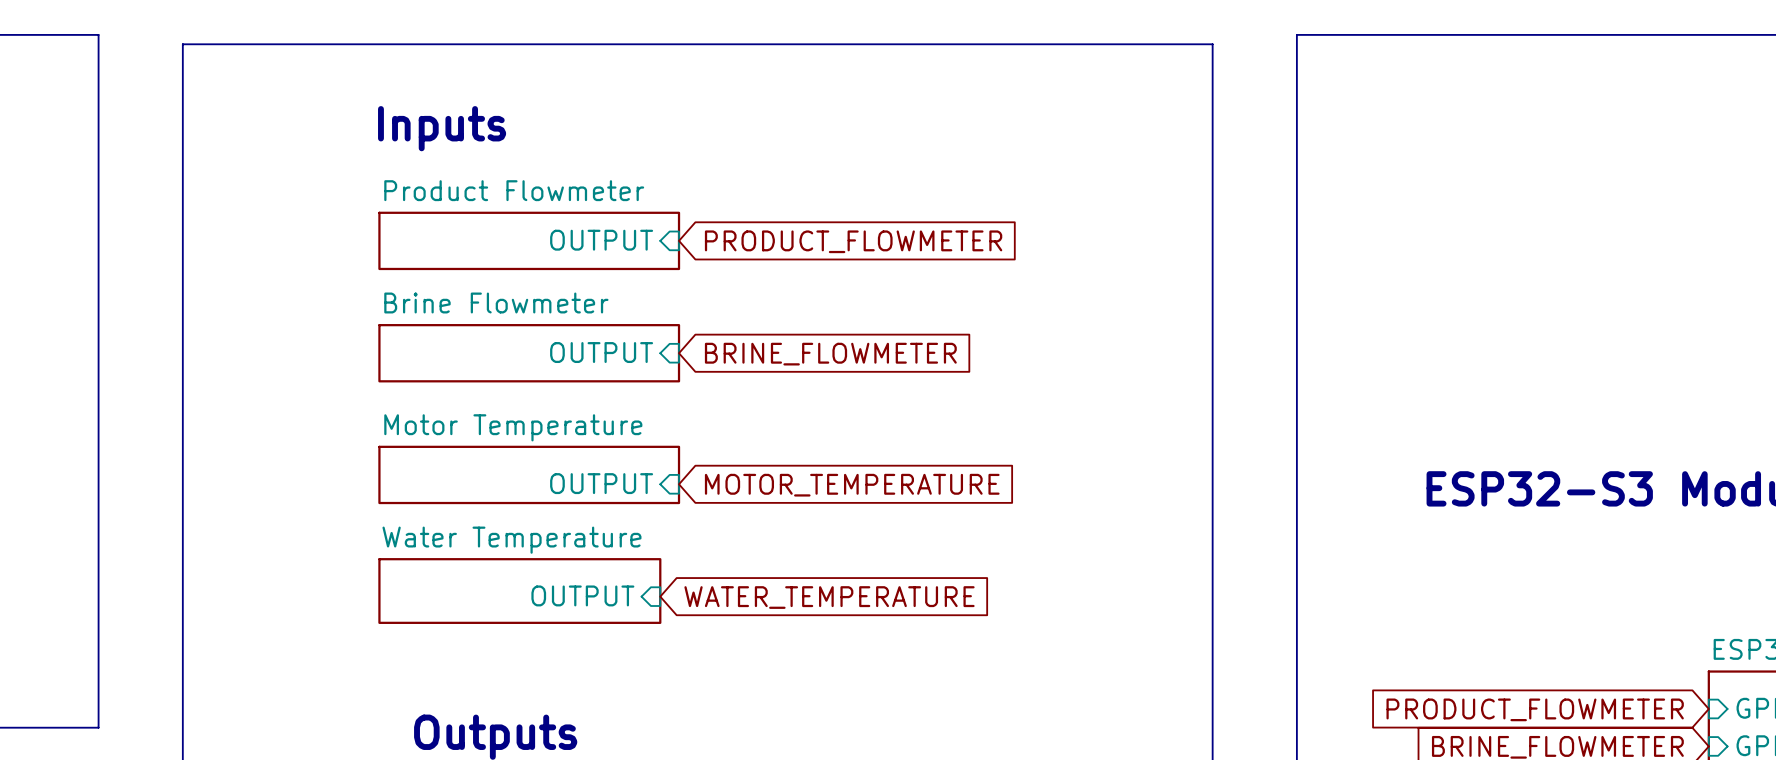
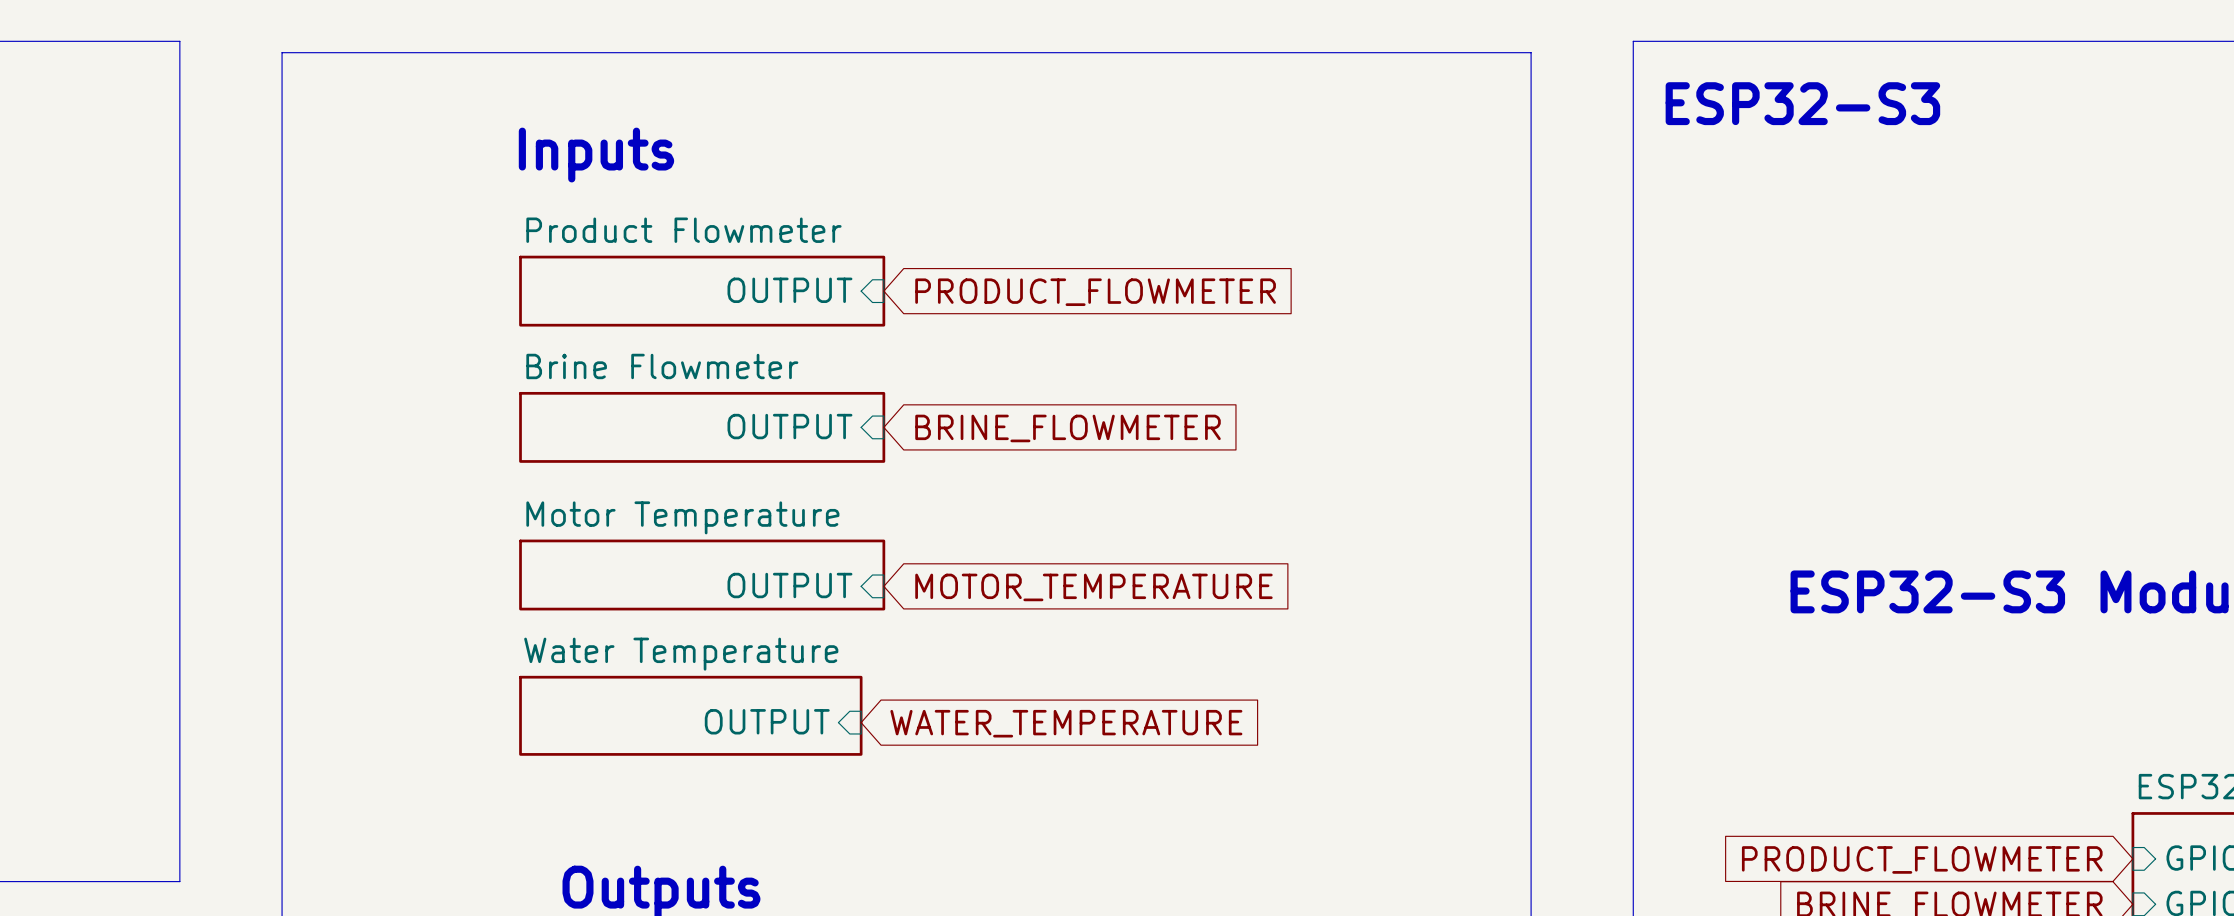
text: none -> ESP32-S3 (1802, 103)

